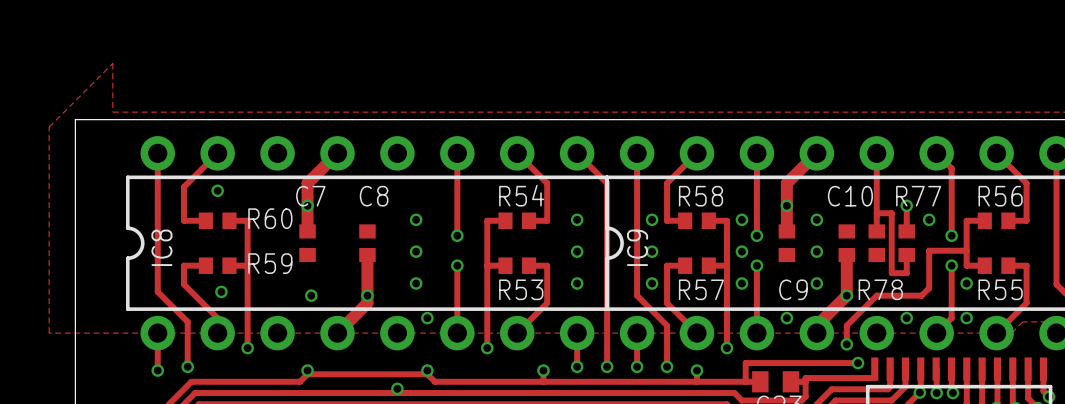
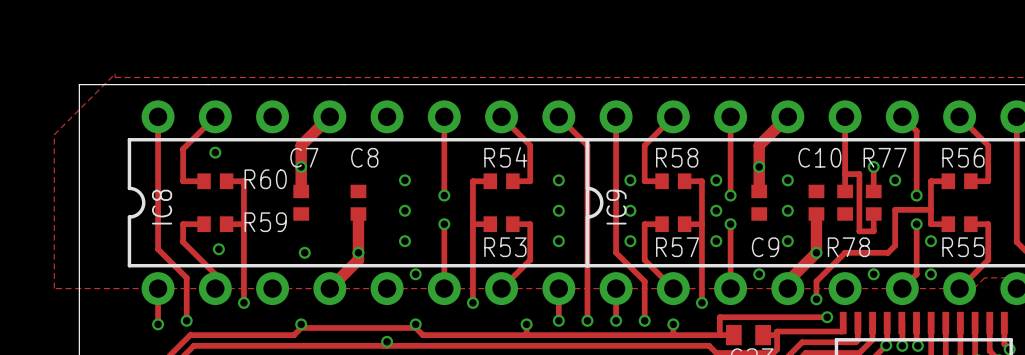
zone outline: (112, 108) (112, 63) (49, 127) (49, 172) -> (115, 73) (54, 134)

